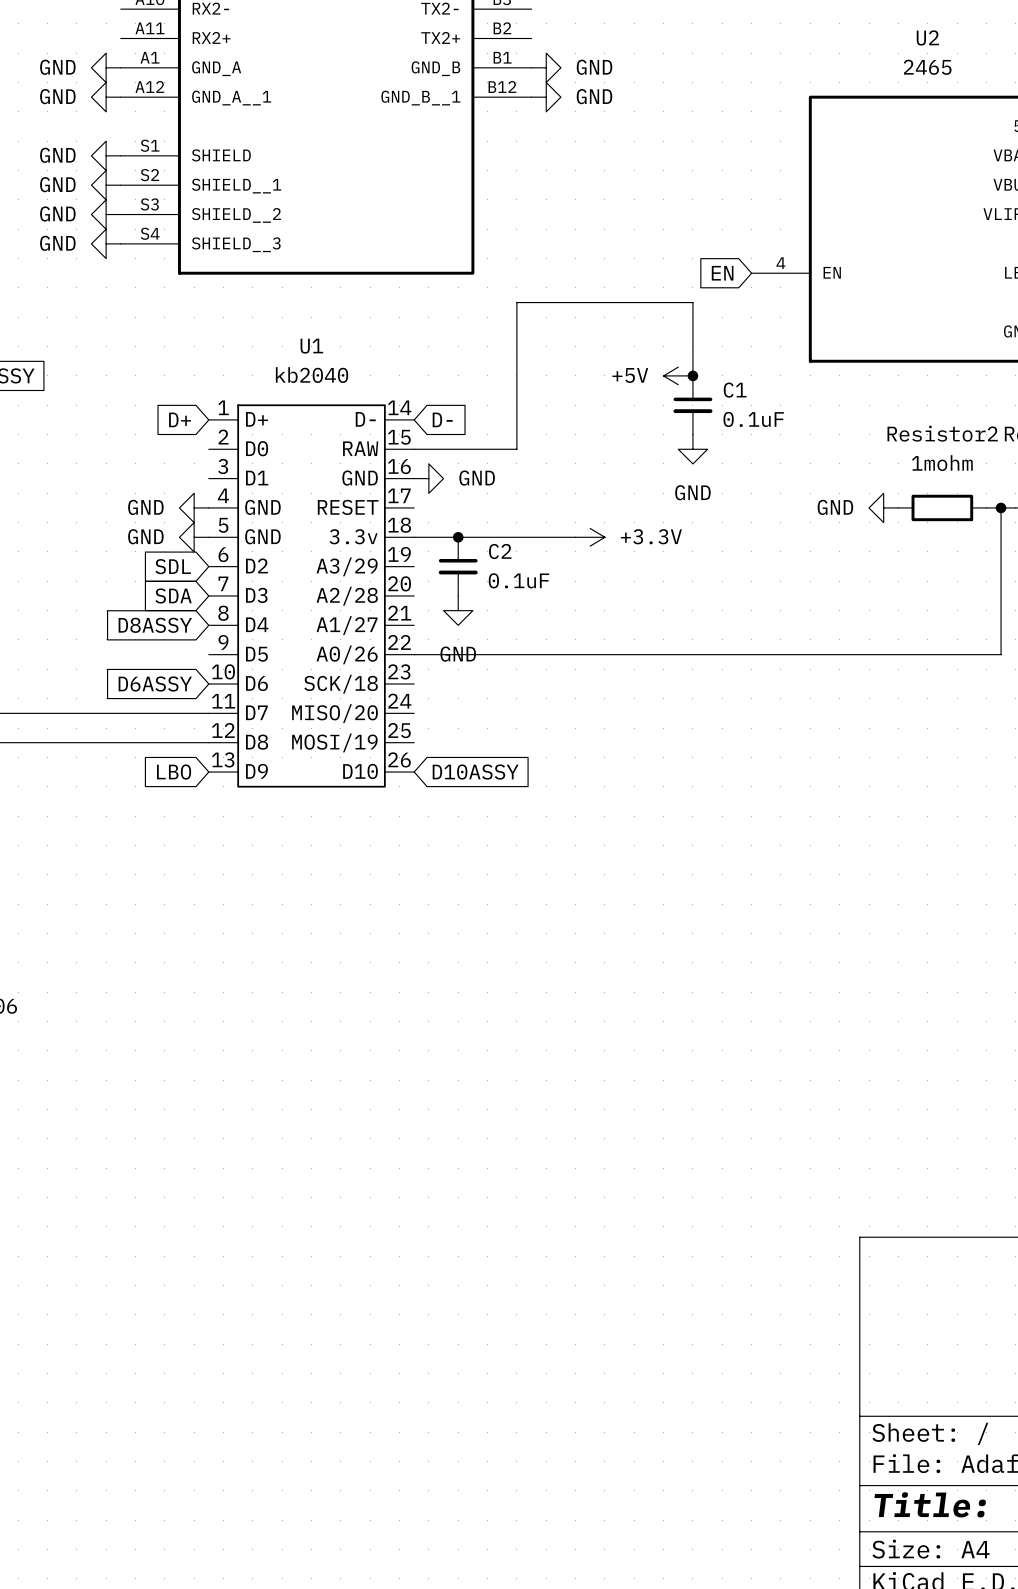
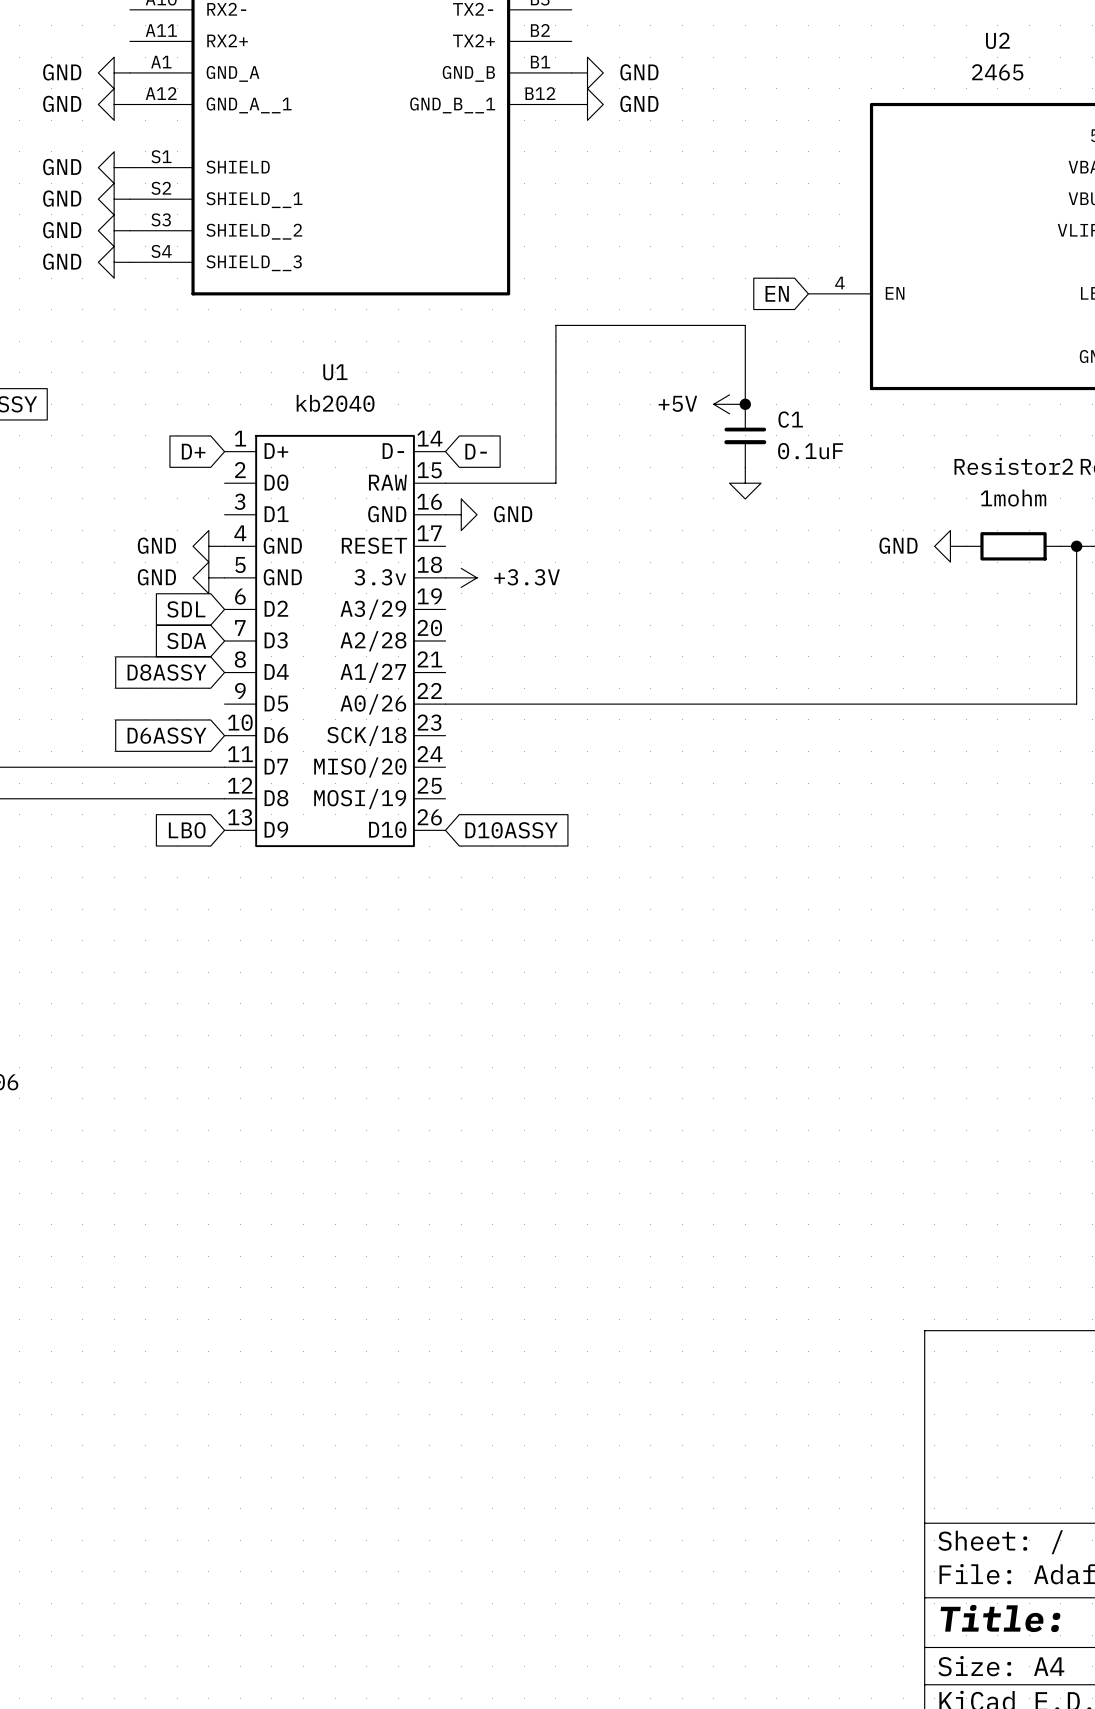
power symbol text: GND (692, 492) -> none
wire: (414, 537) (575, 537) -> none
junction: (458, 537) -> none
power symbol position: +3.3V (590, 537) -> +3.3V (461, 577)
C2: 0.1uF (458, 566) -> none
power symbol: GND (458, 610) -> none

